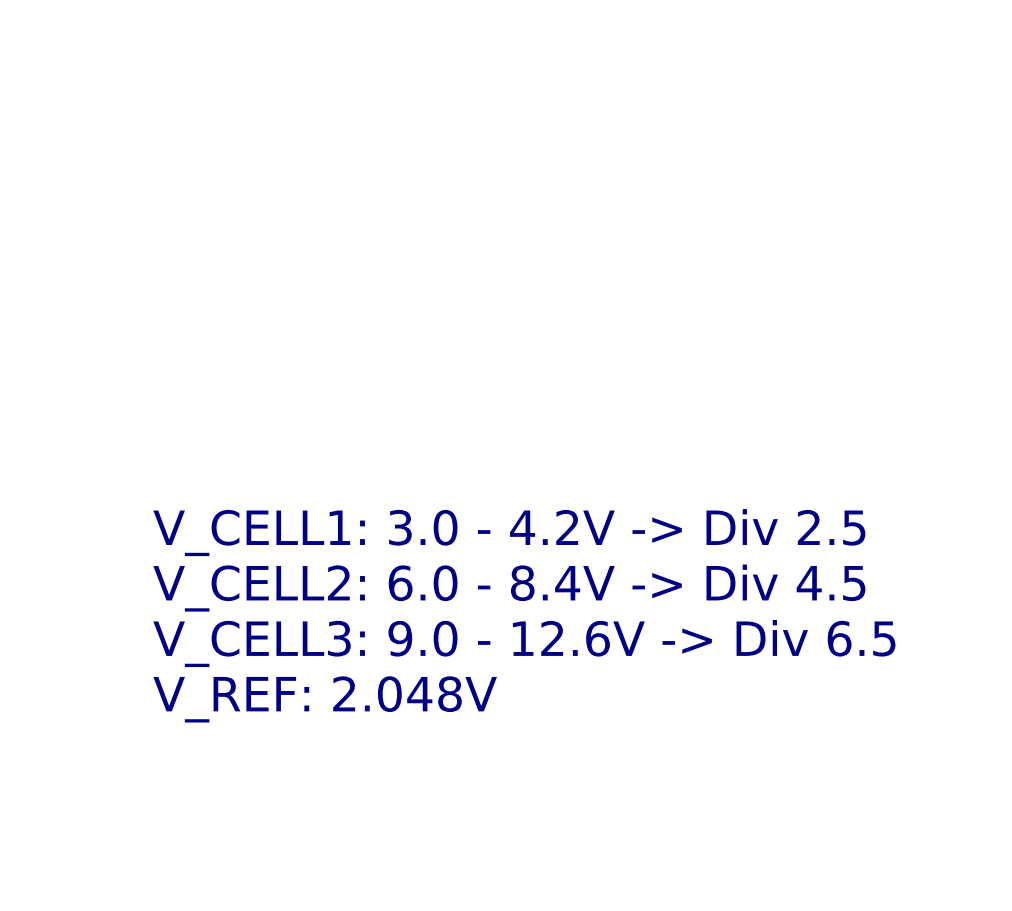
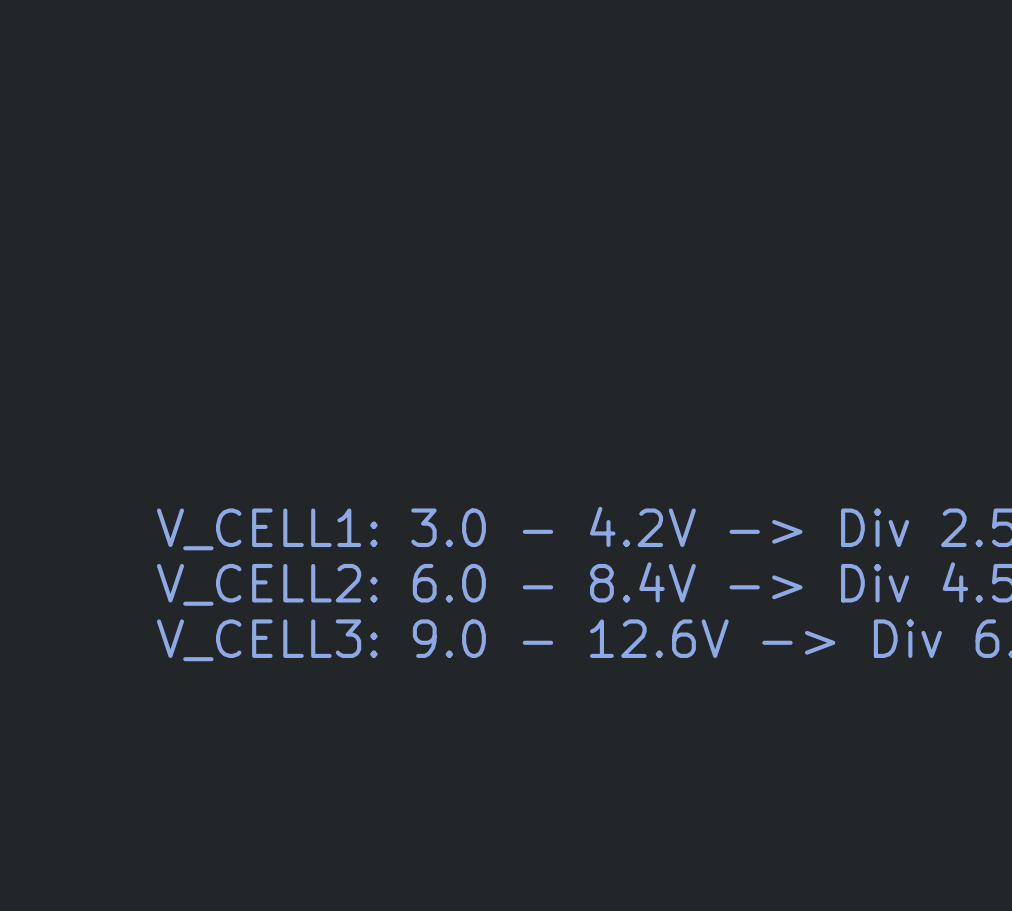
text: V_REF: 2.048V (325, 699) -> none

